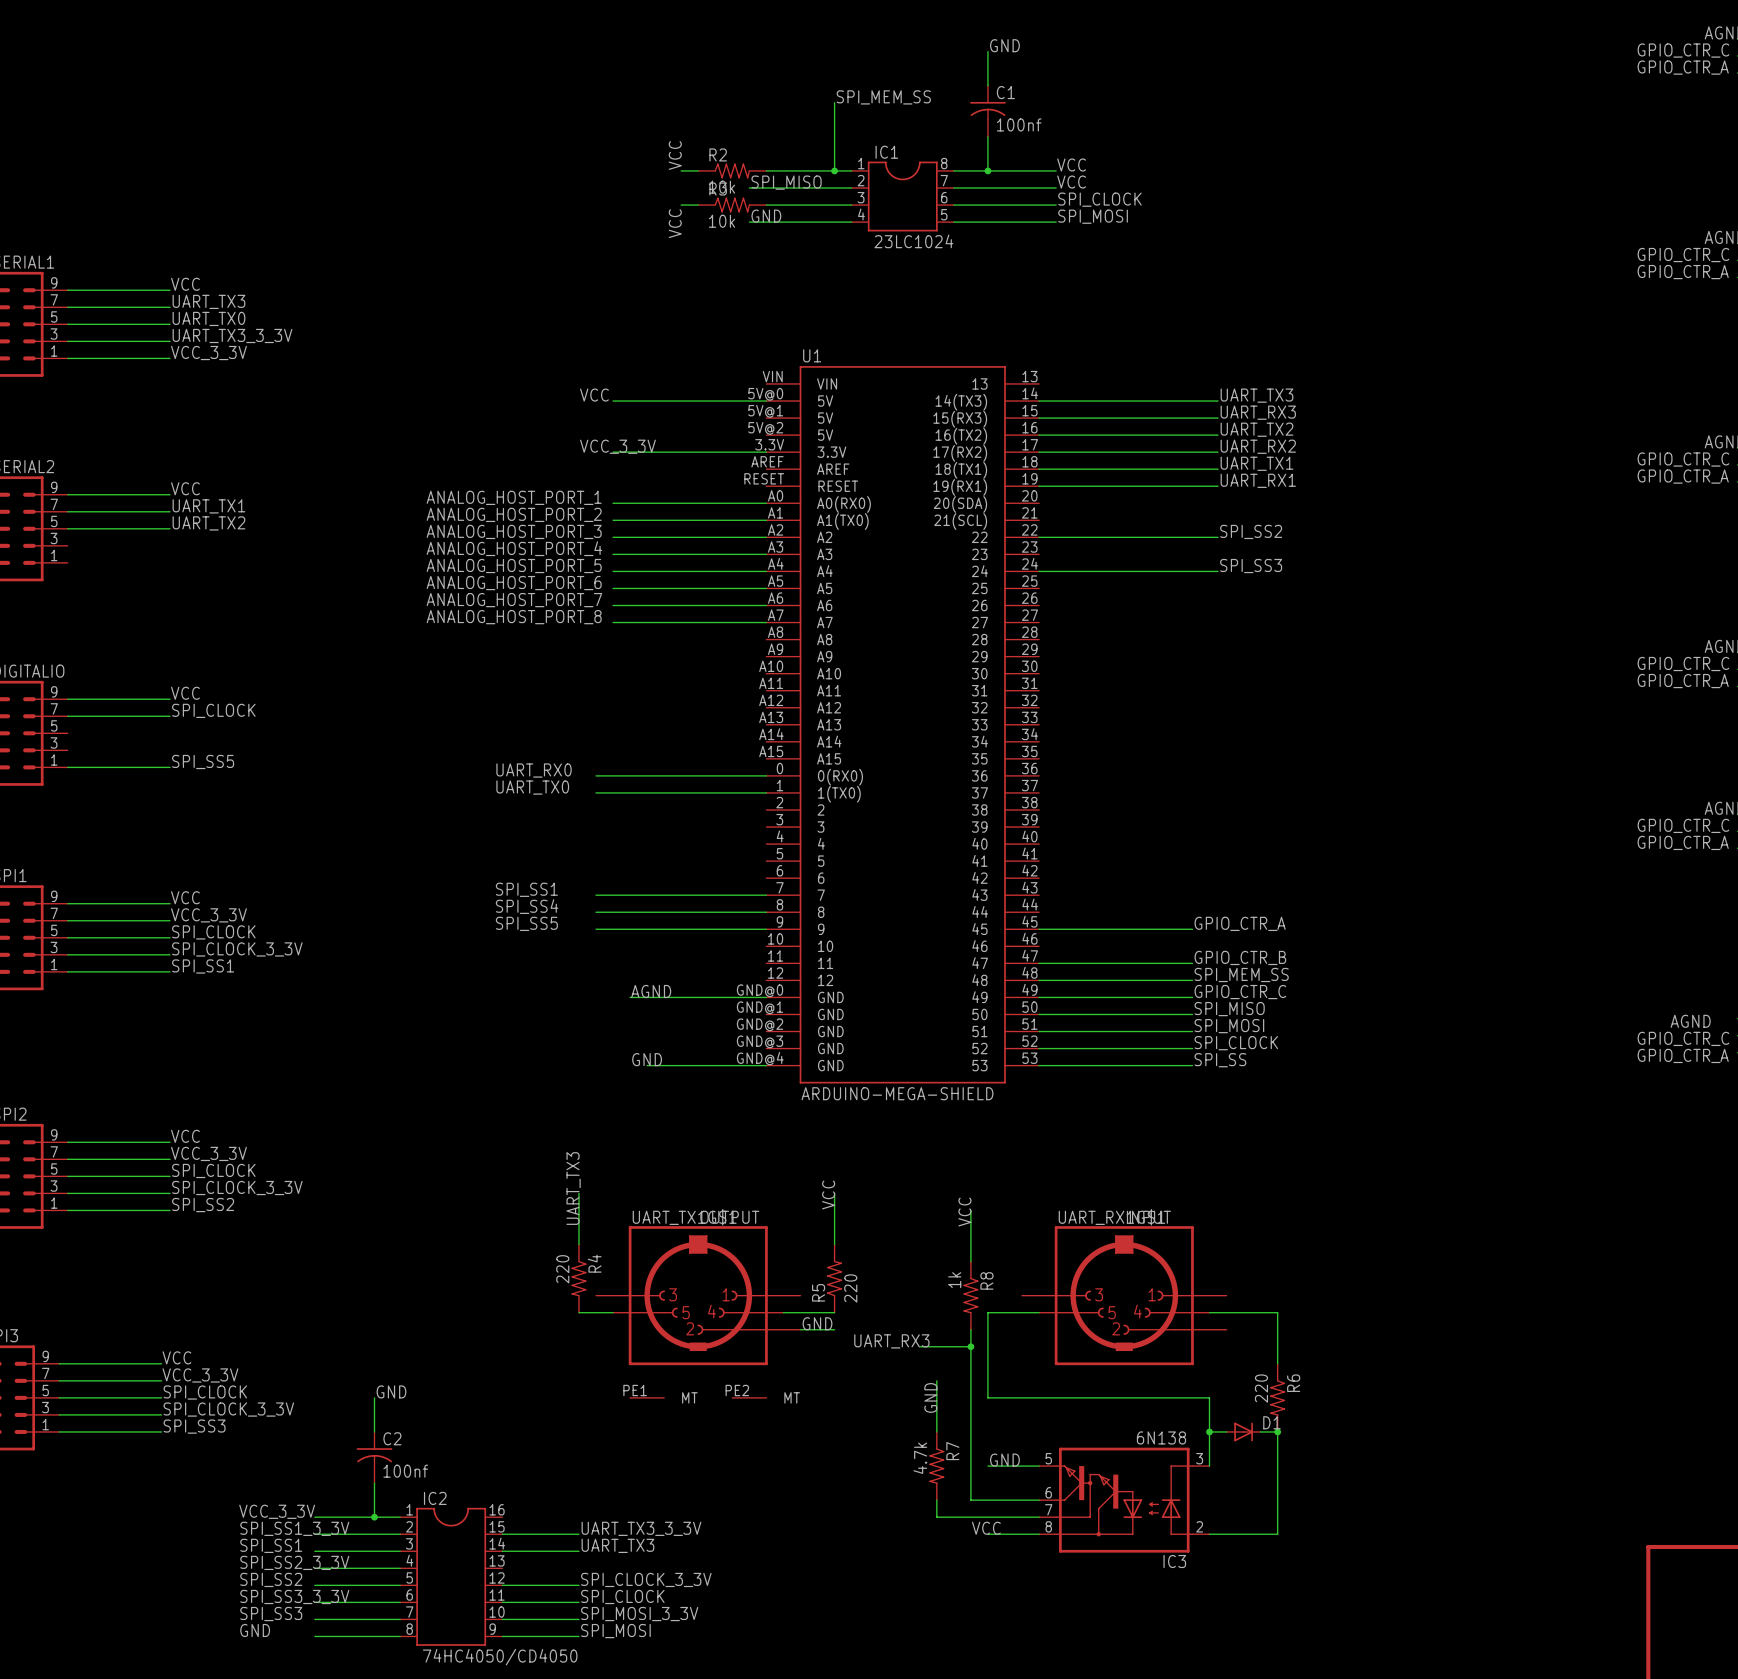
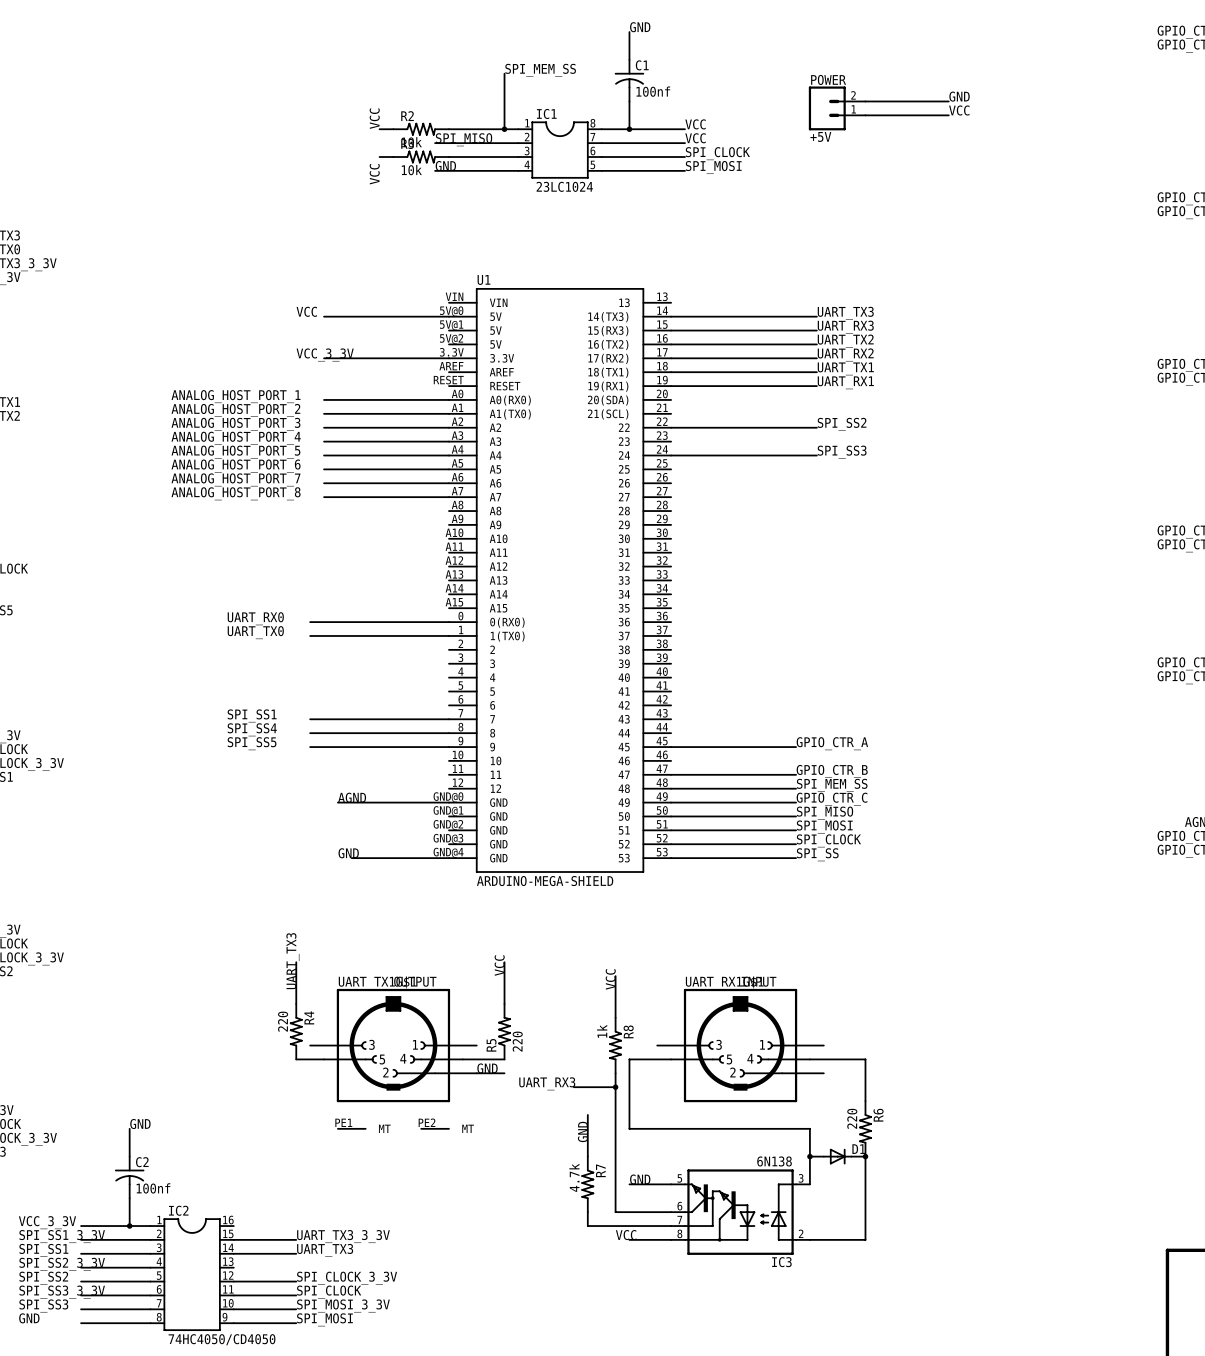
label: none -> GND (959, 96)
wire: none -> (865, 101) (948, 101)
POWER: none -> +5V (837, 108)
label: none -> VCC (959, 110)
wire: none -> (865, 115) (948, 115)

